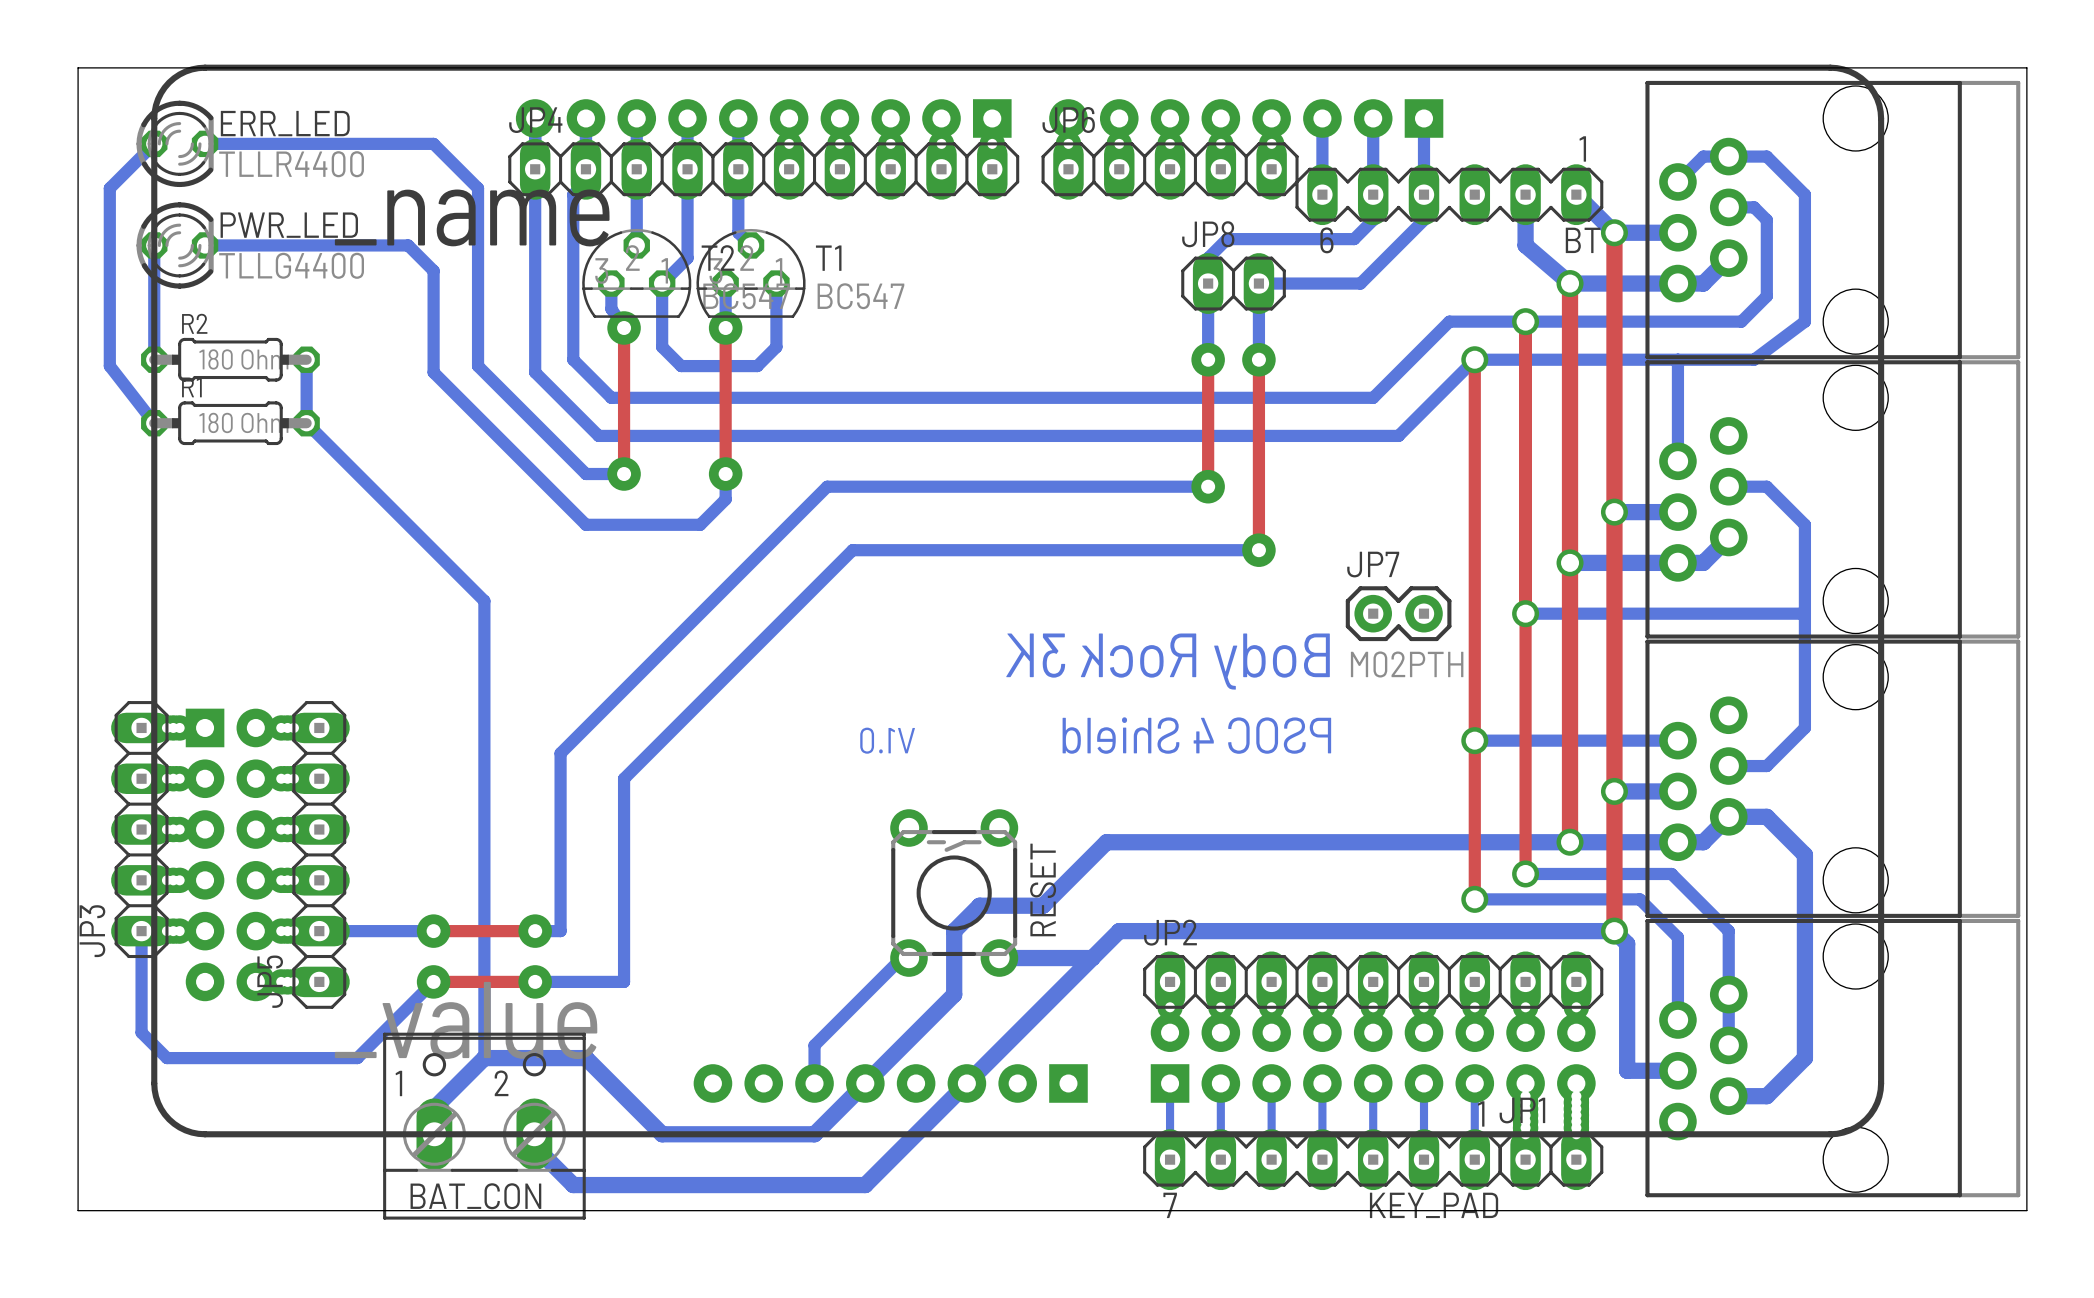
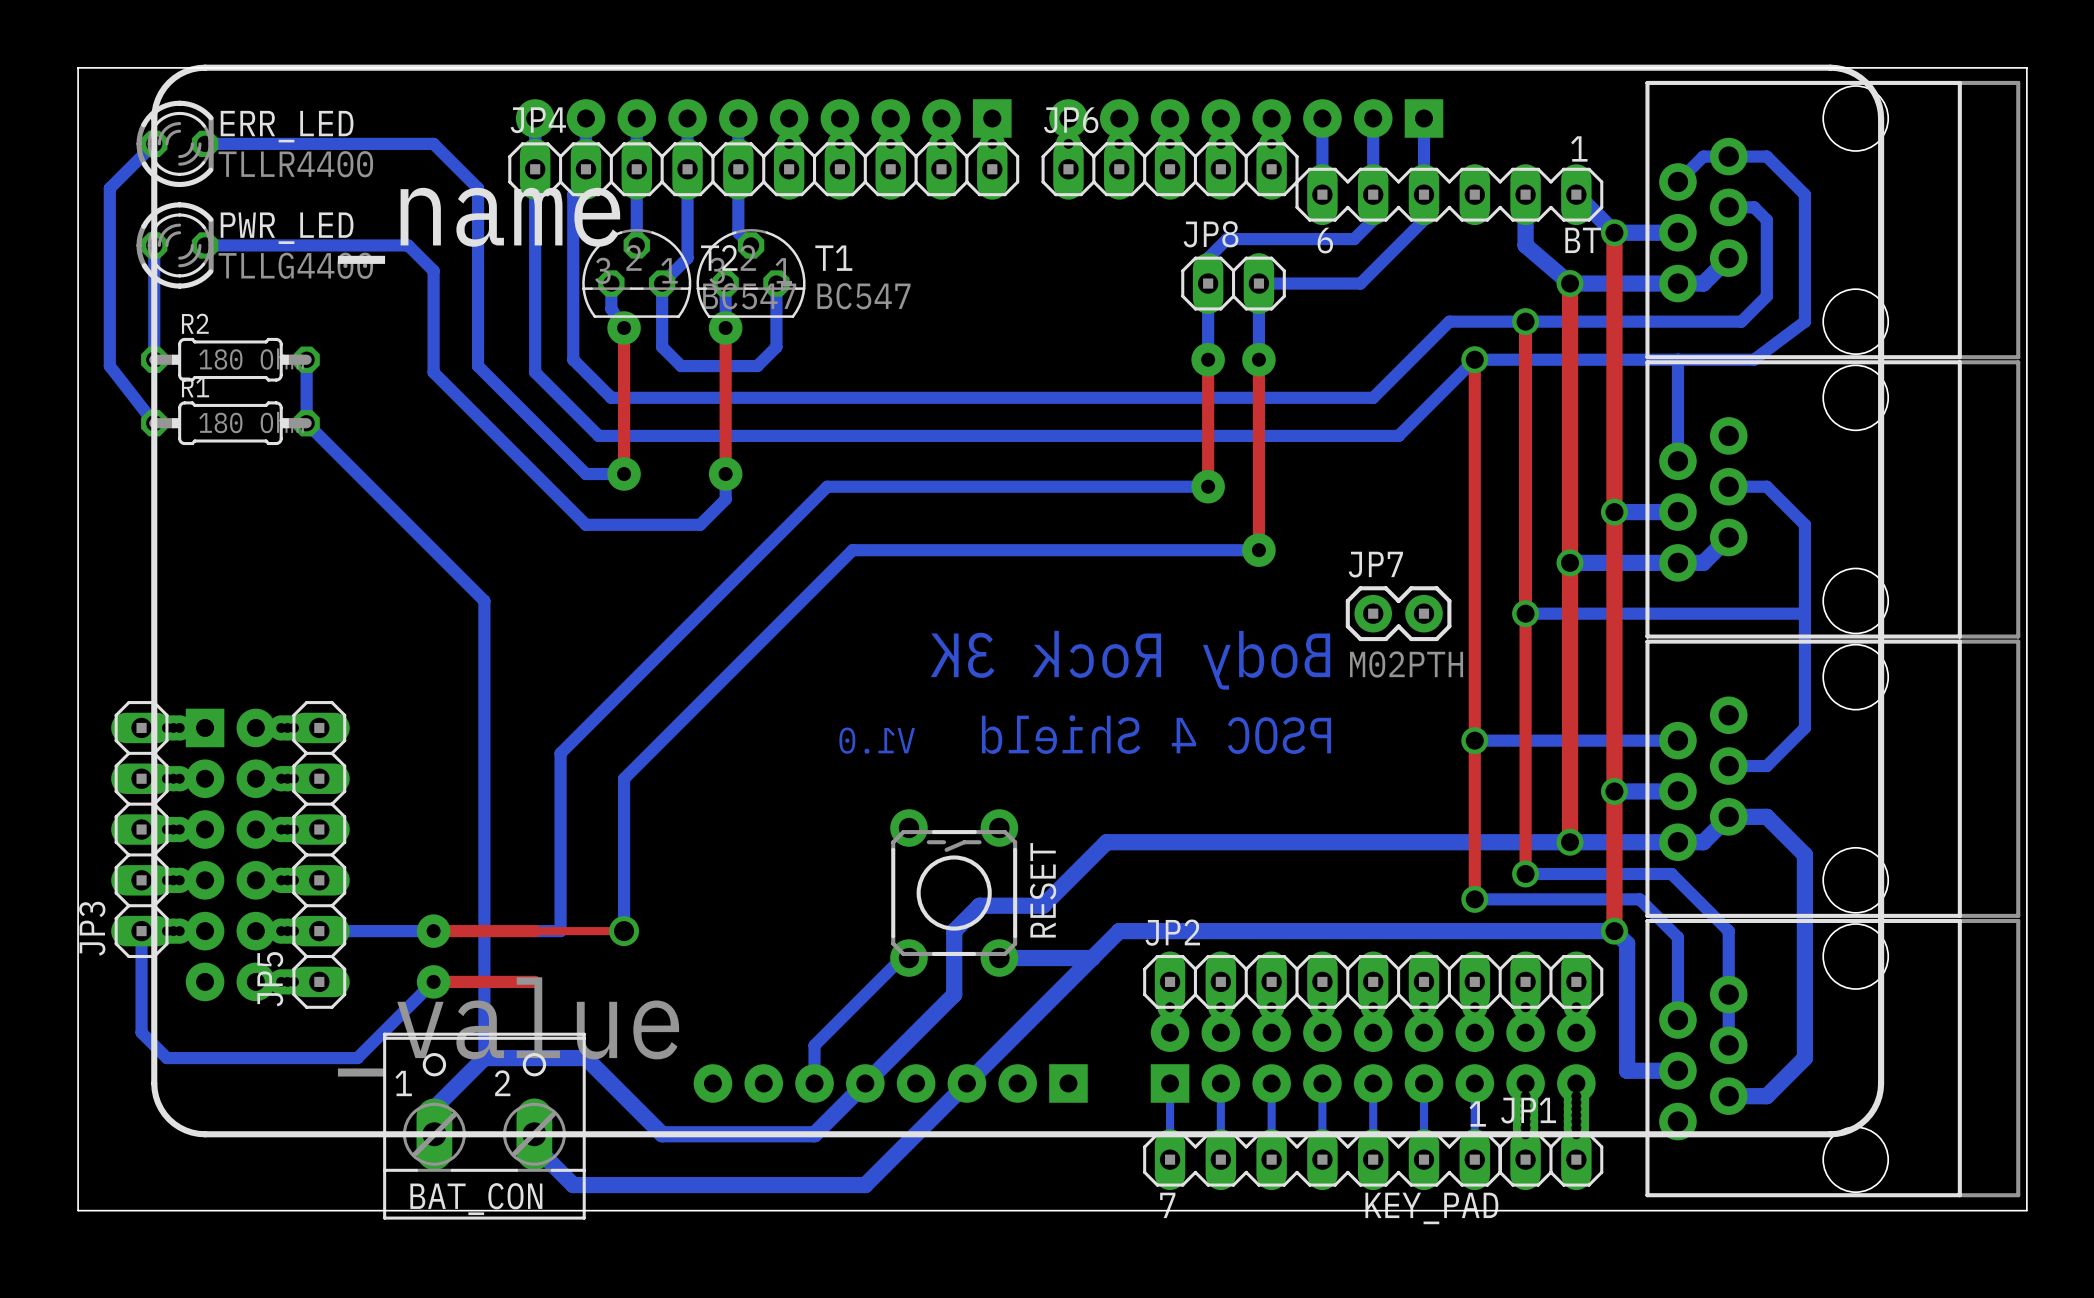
top track: none -> (535, 931) (624, 931)
via: (535, 931) -> none
bottom track: (624, 931) (624, 981) (535, 981) -> none
via: none -> (624, 931)
via: (535, 981) -> none

